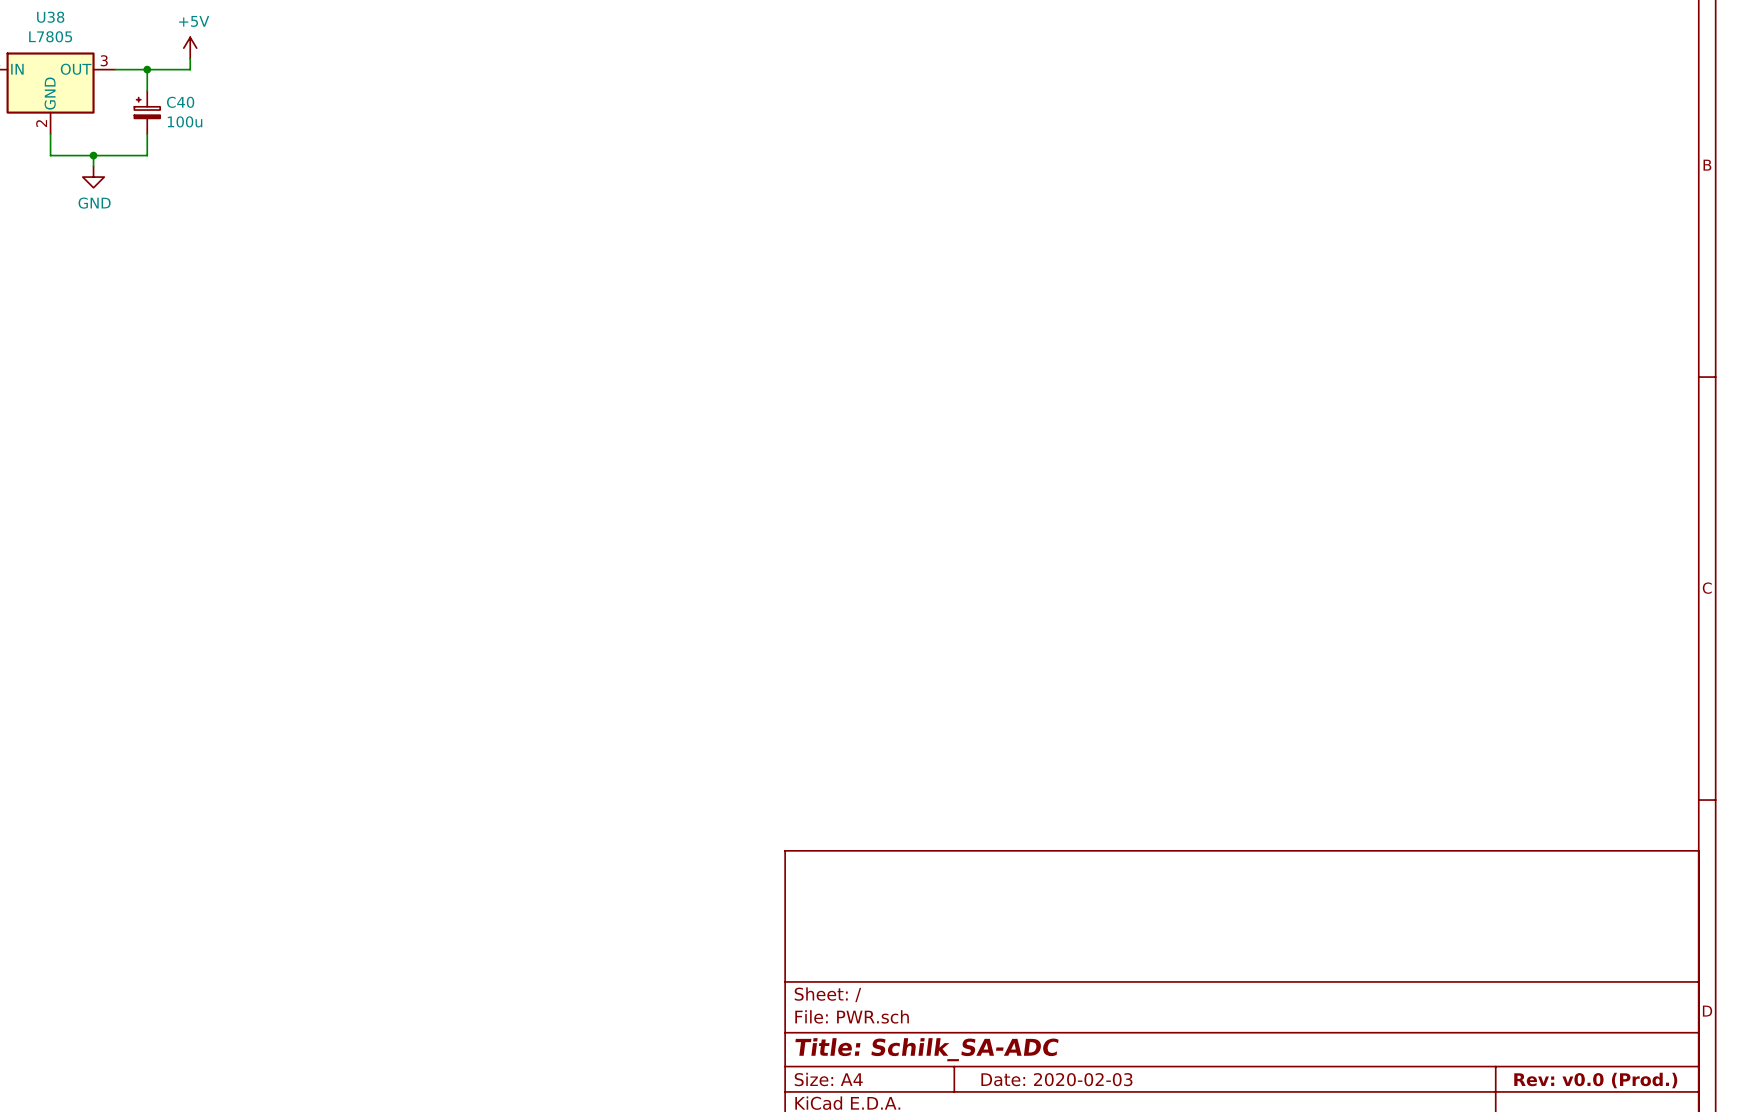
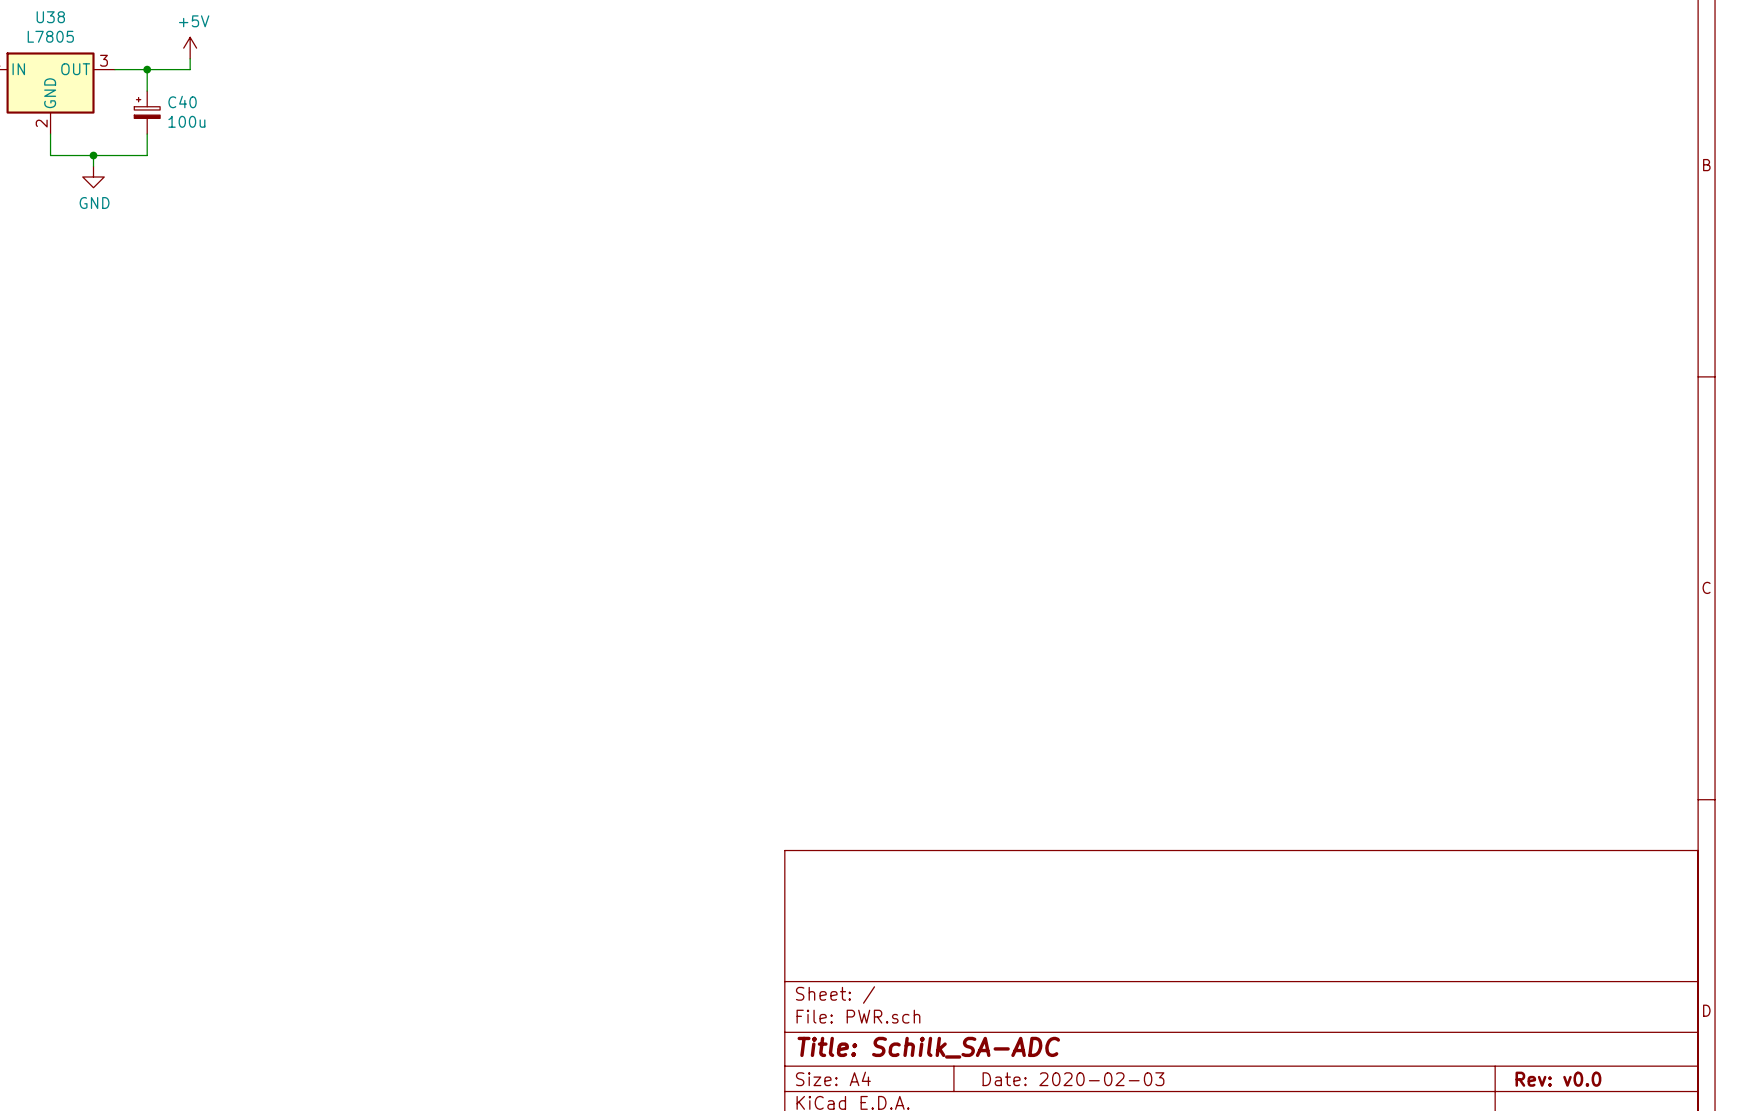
title block: Rev: v0.0 (Prod.) (1595, 1080) -> Rev: v0.0 (1558, 1079)

